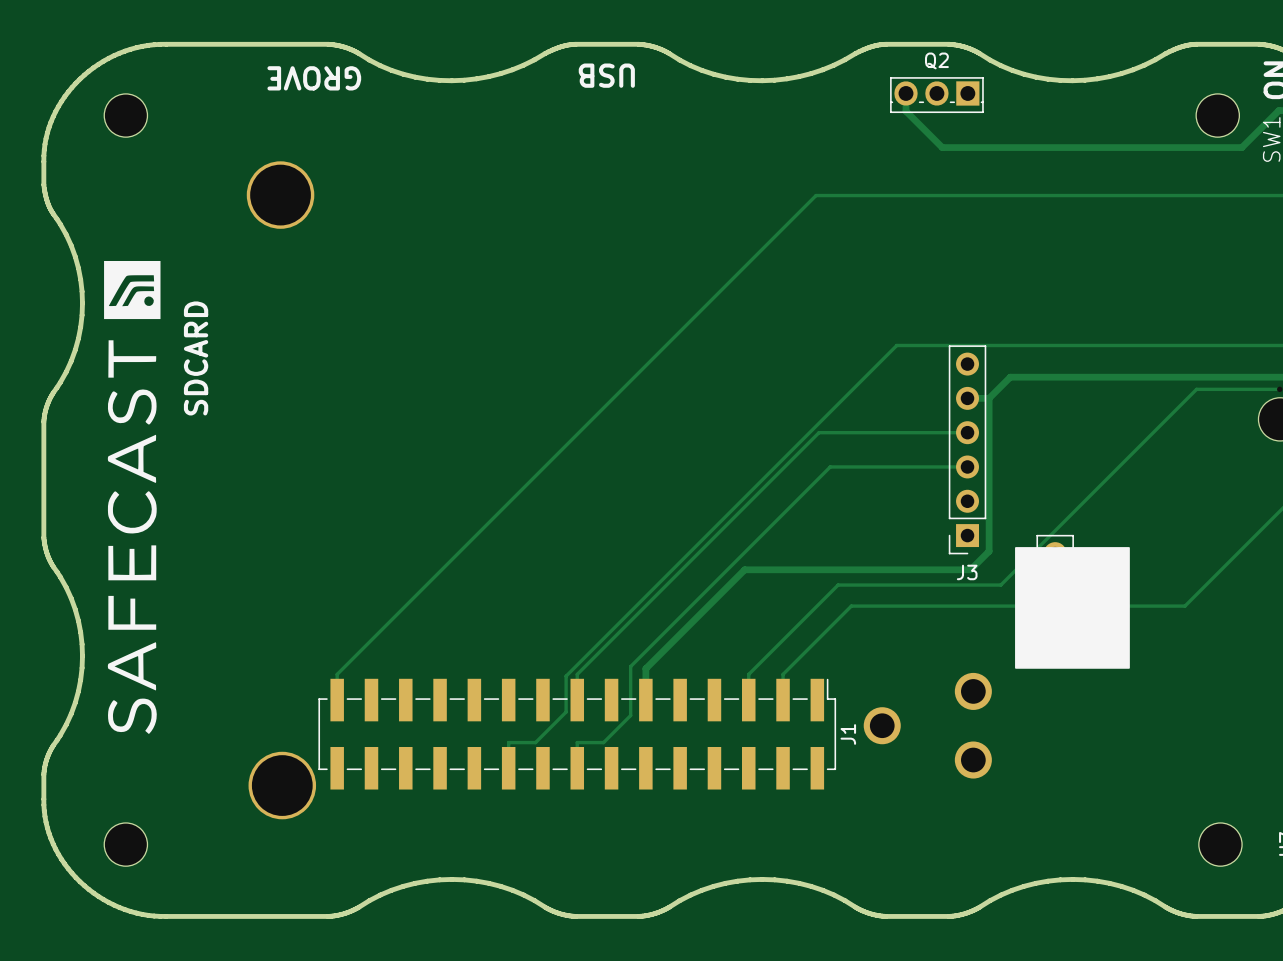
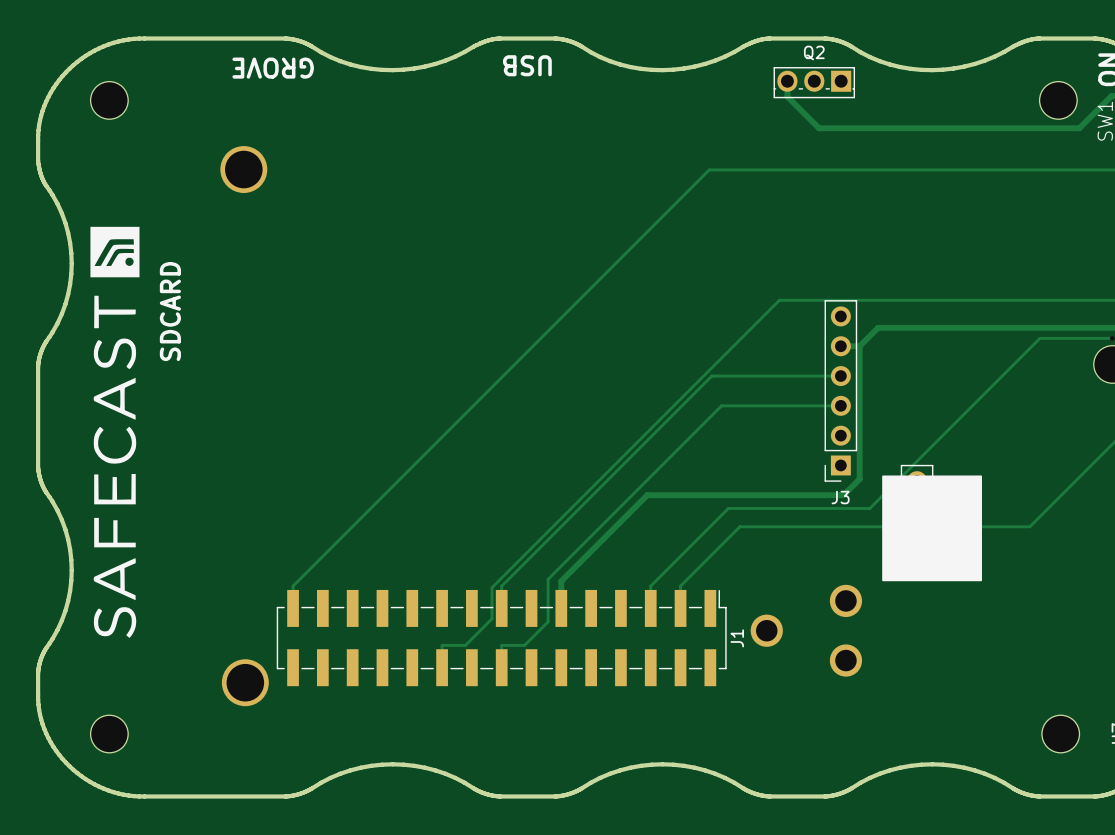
part footprint: [246, 161, 315, 229] -> [220, 146, 268, 194]
part footprint: [248, 751, 317, 820] -> [221, 659, 269, 707]

